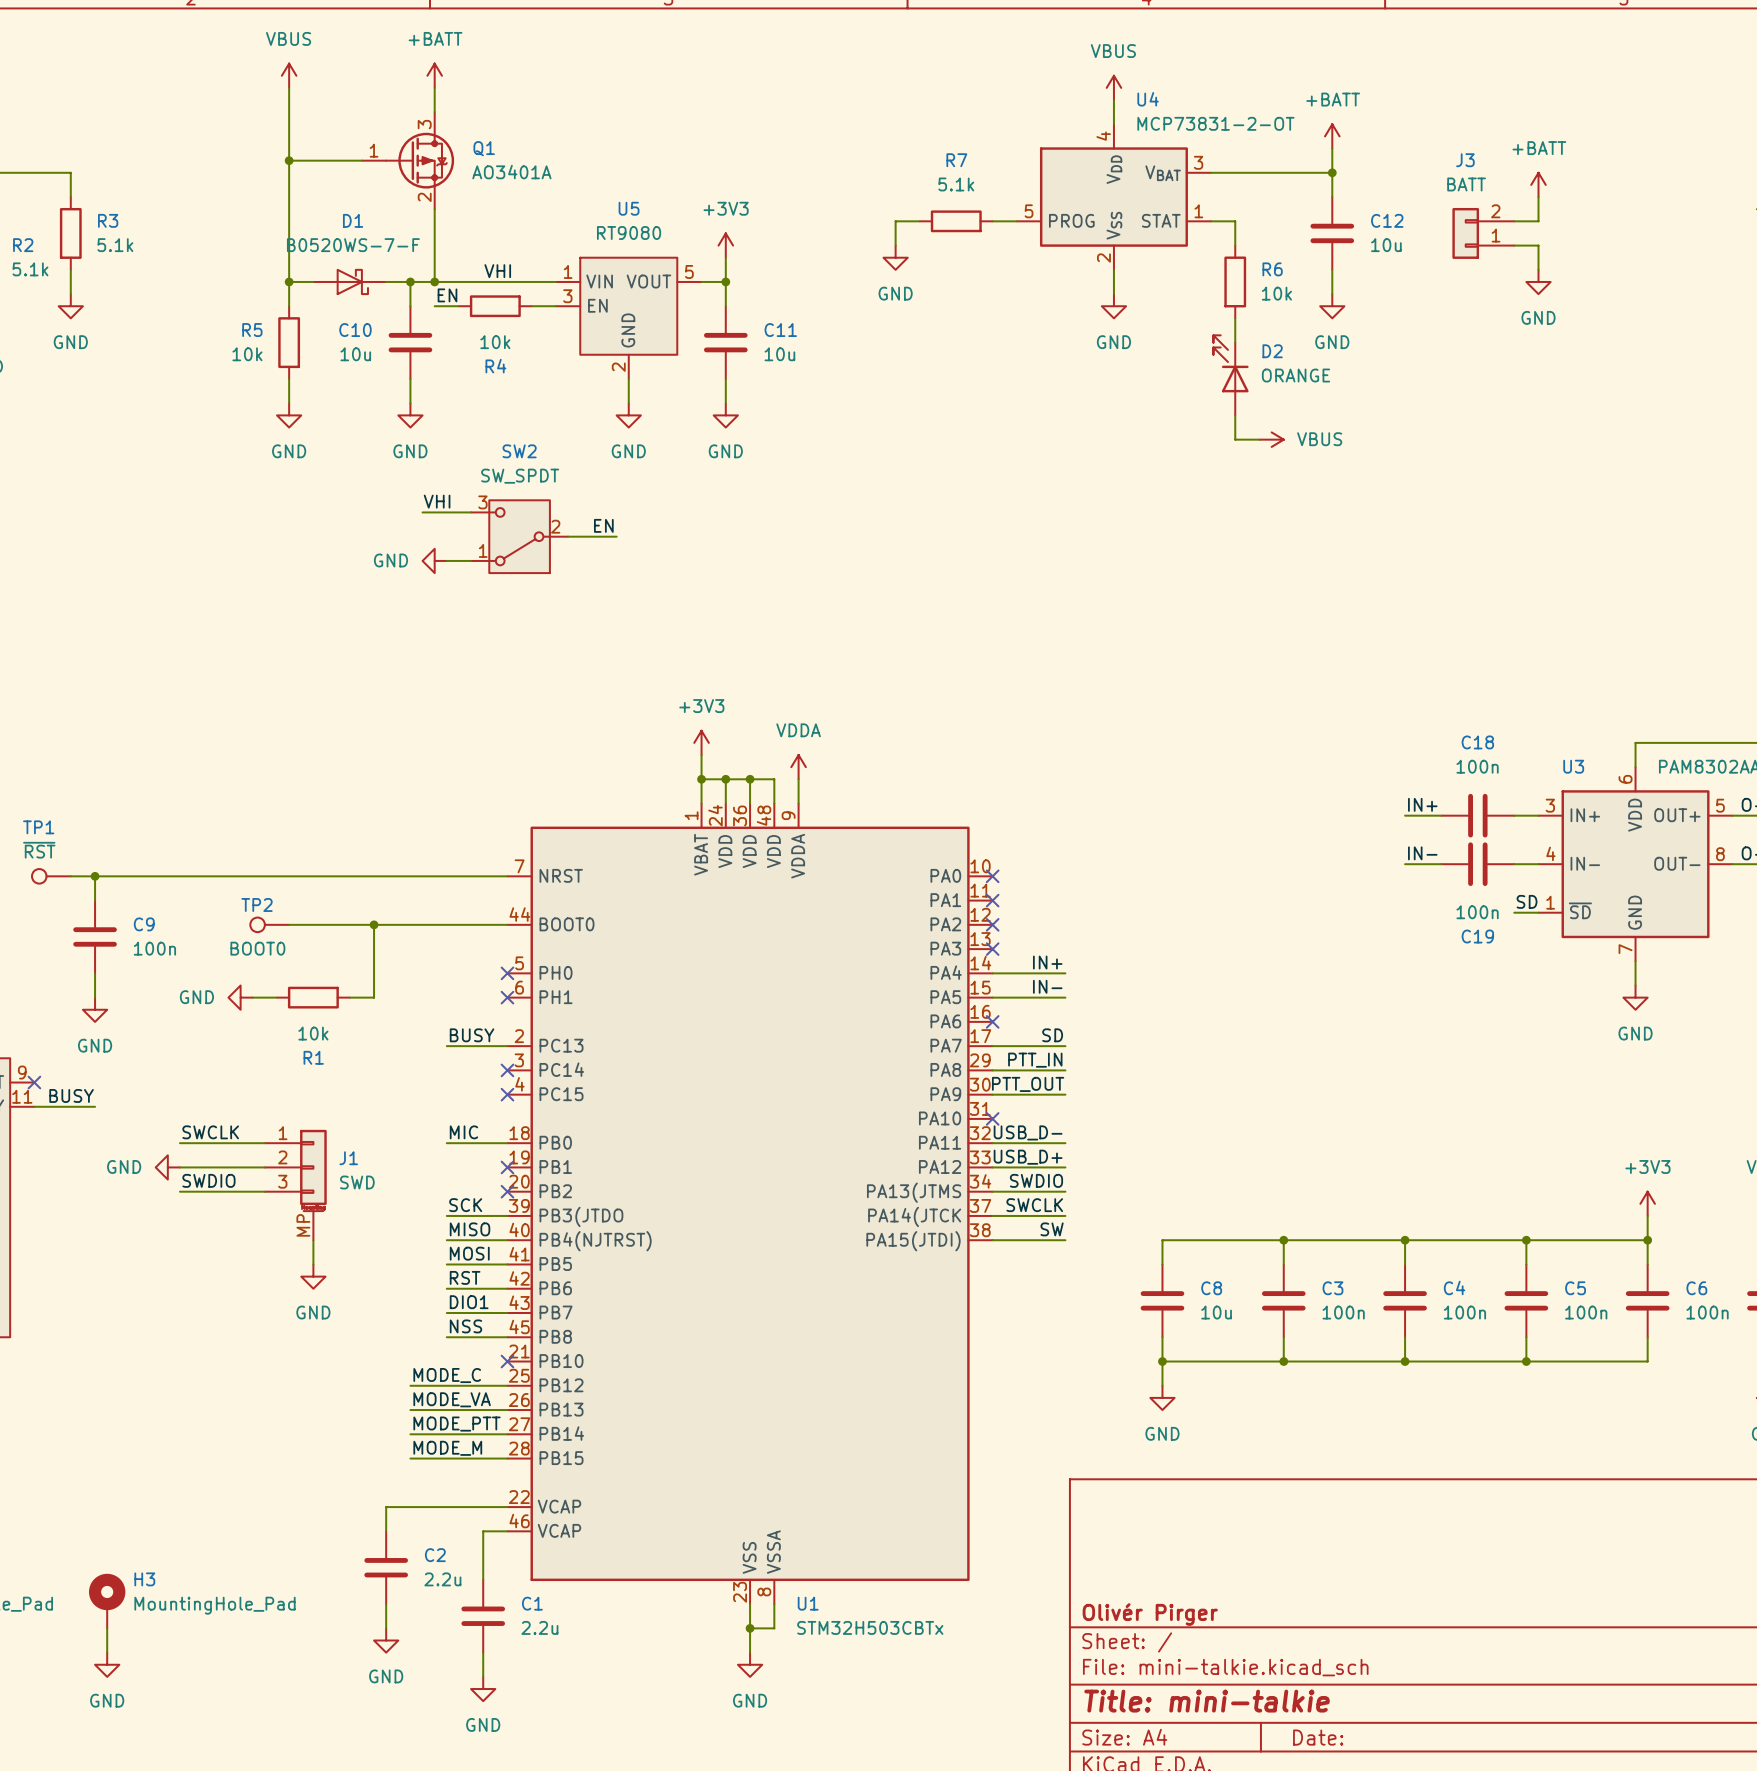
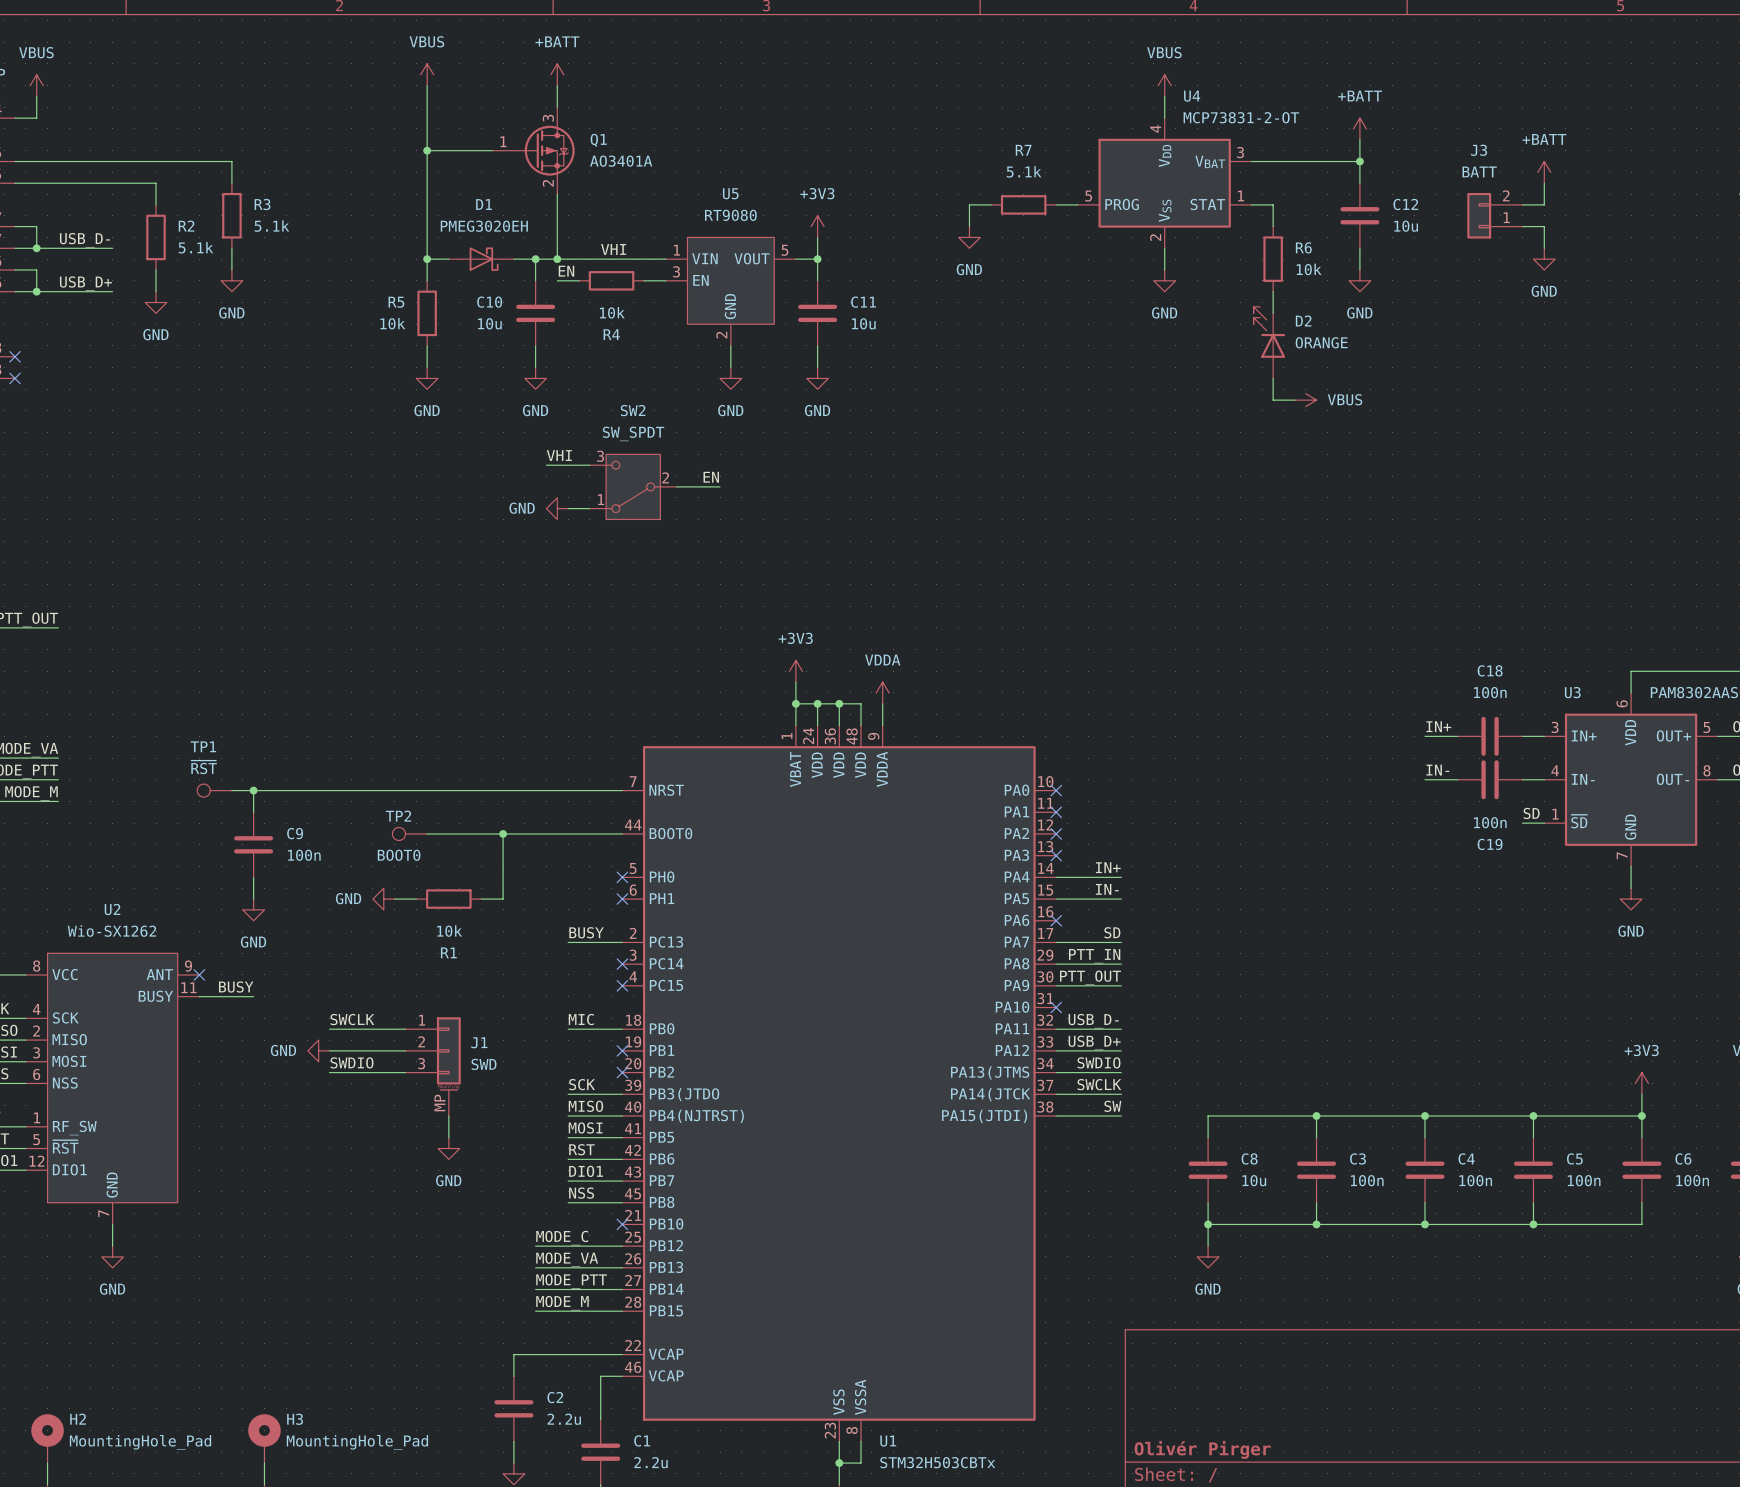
D1 value: B0520WS-7-F (353, 245) -> PMEG3020EH (484, 226)

